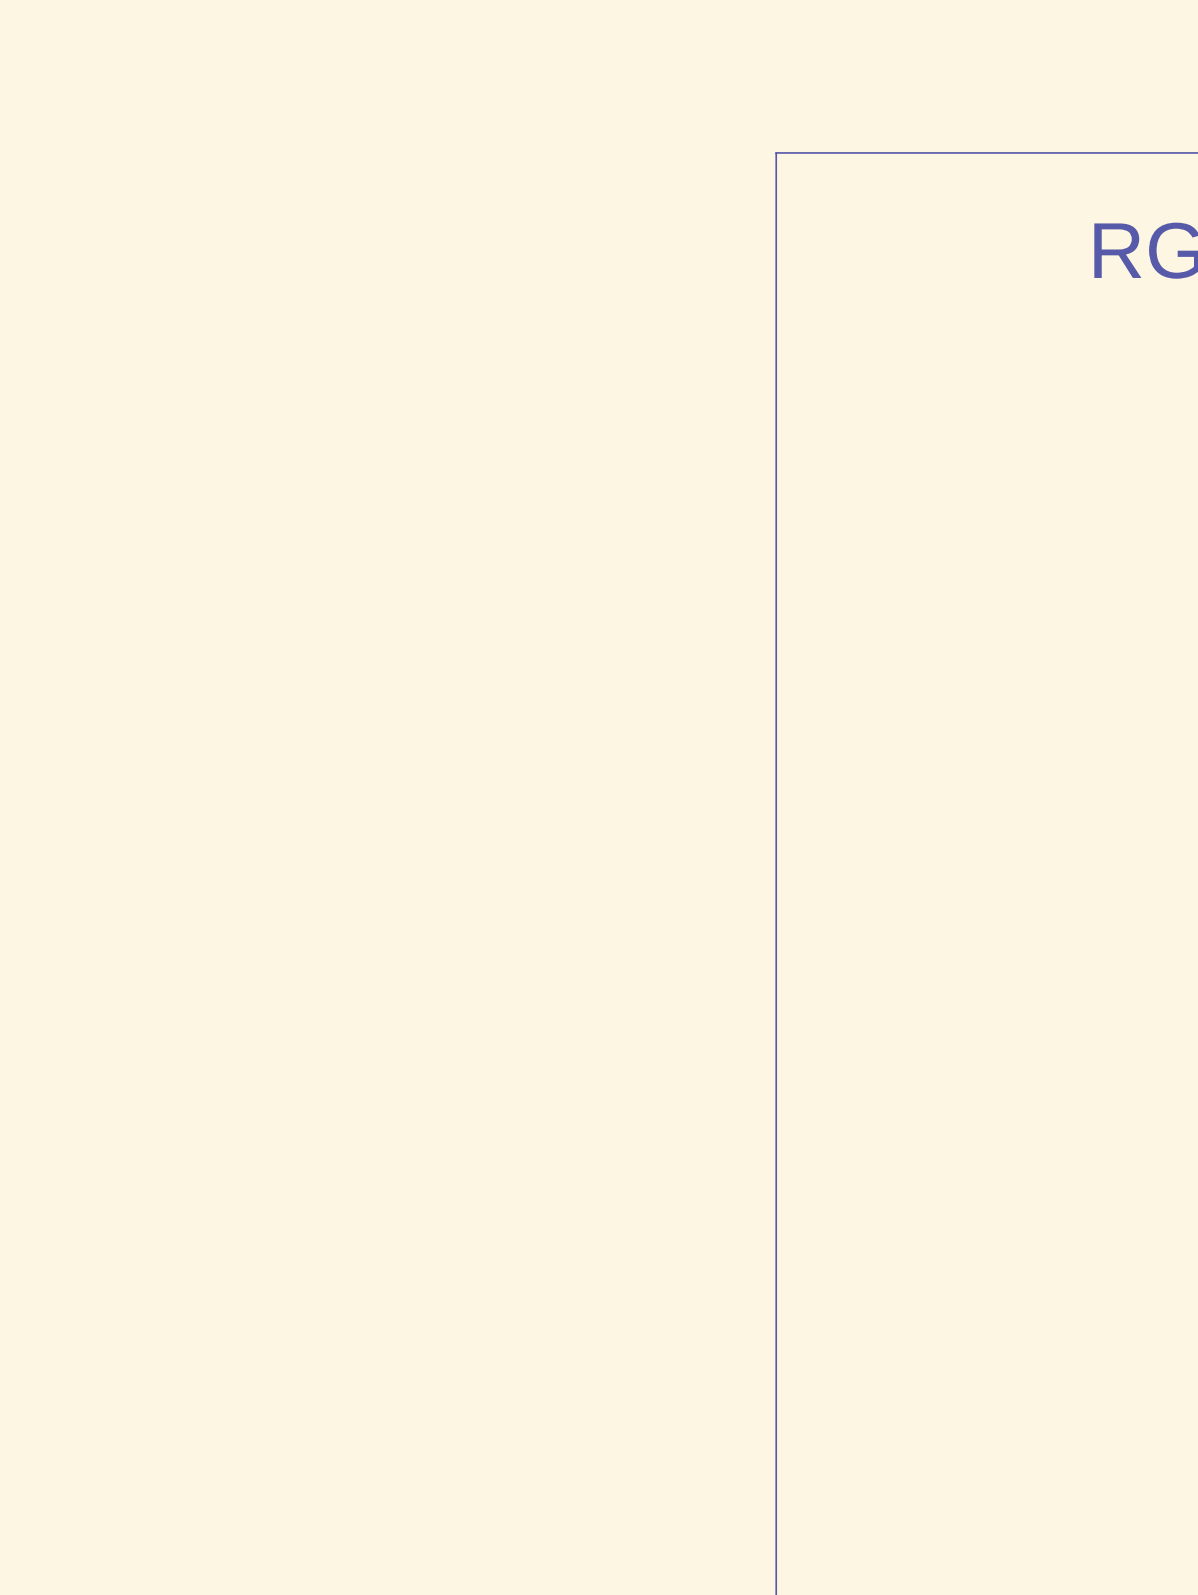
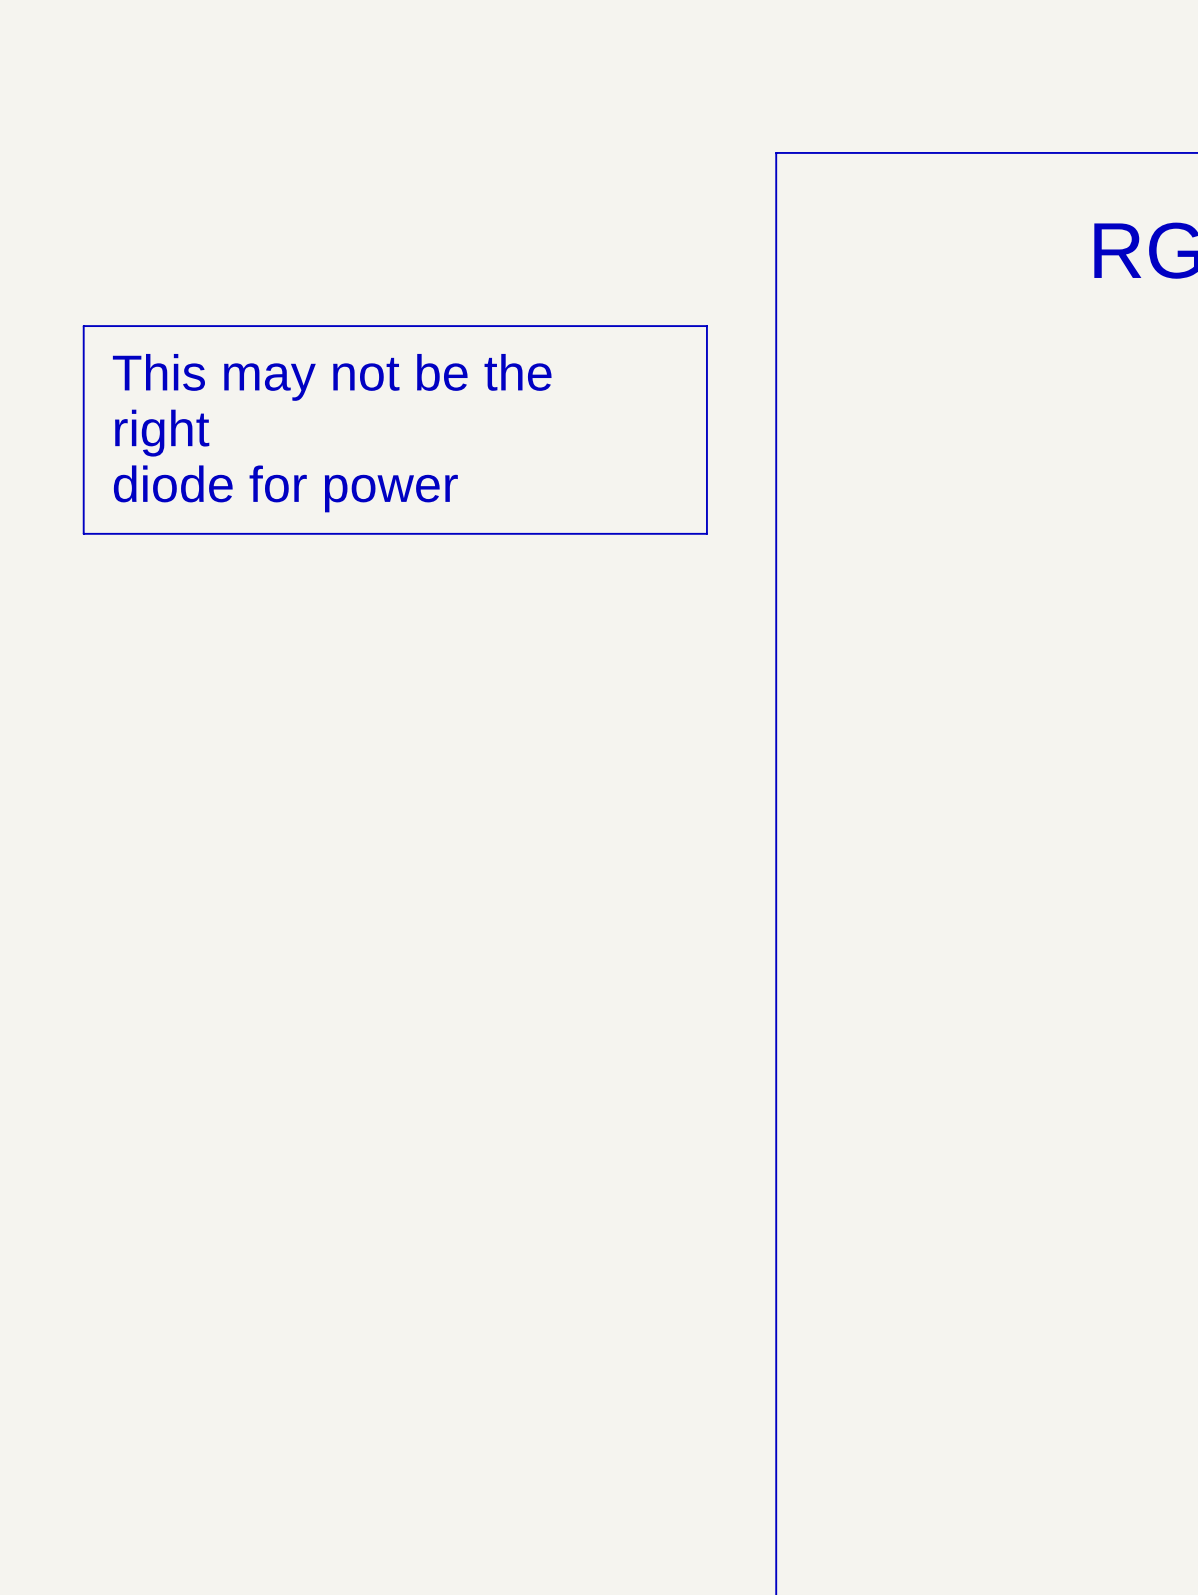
line: none -> (83, 326) (706, 326) (706, 533) (83, 533) (83, 326)
text: none -> This may not be the (332, 377)
text: none -> right (162, 433)
text: none -> diode for power (285, 488)

